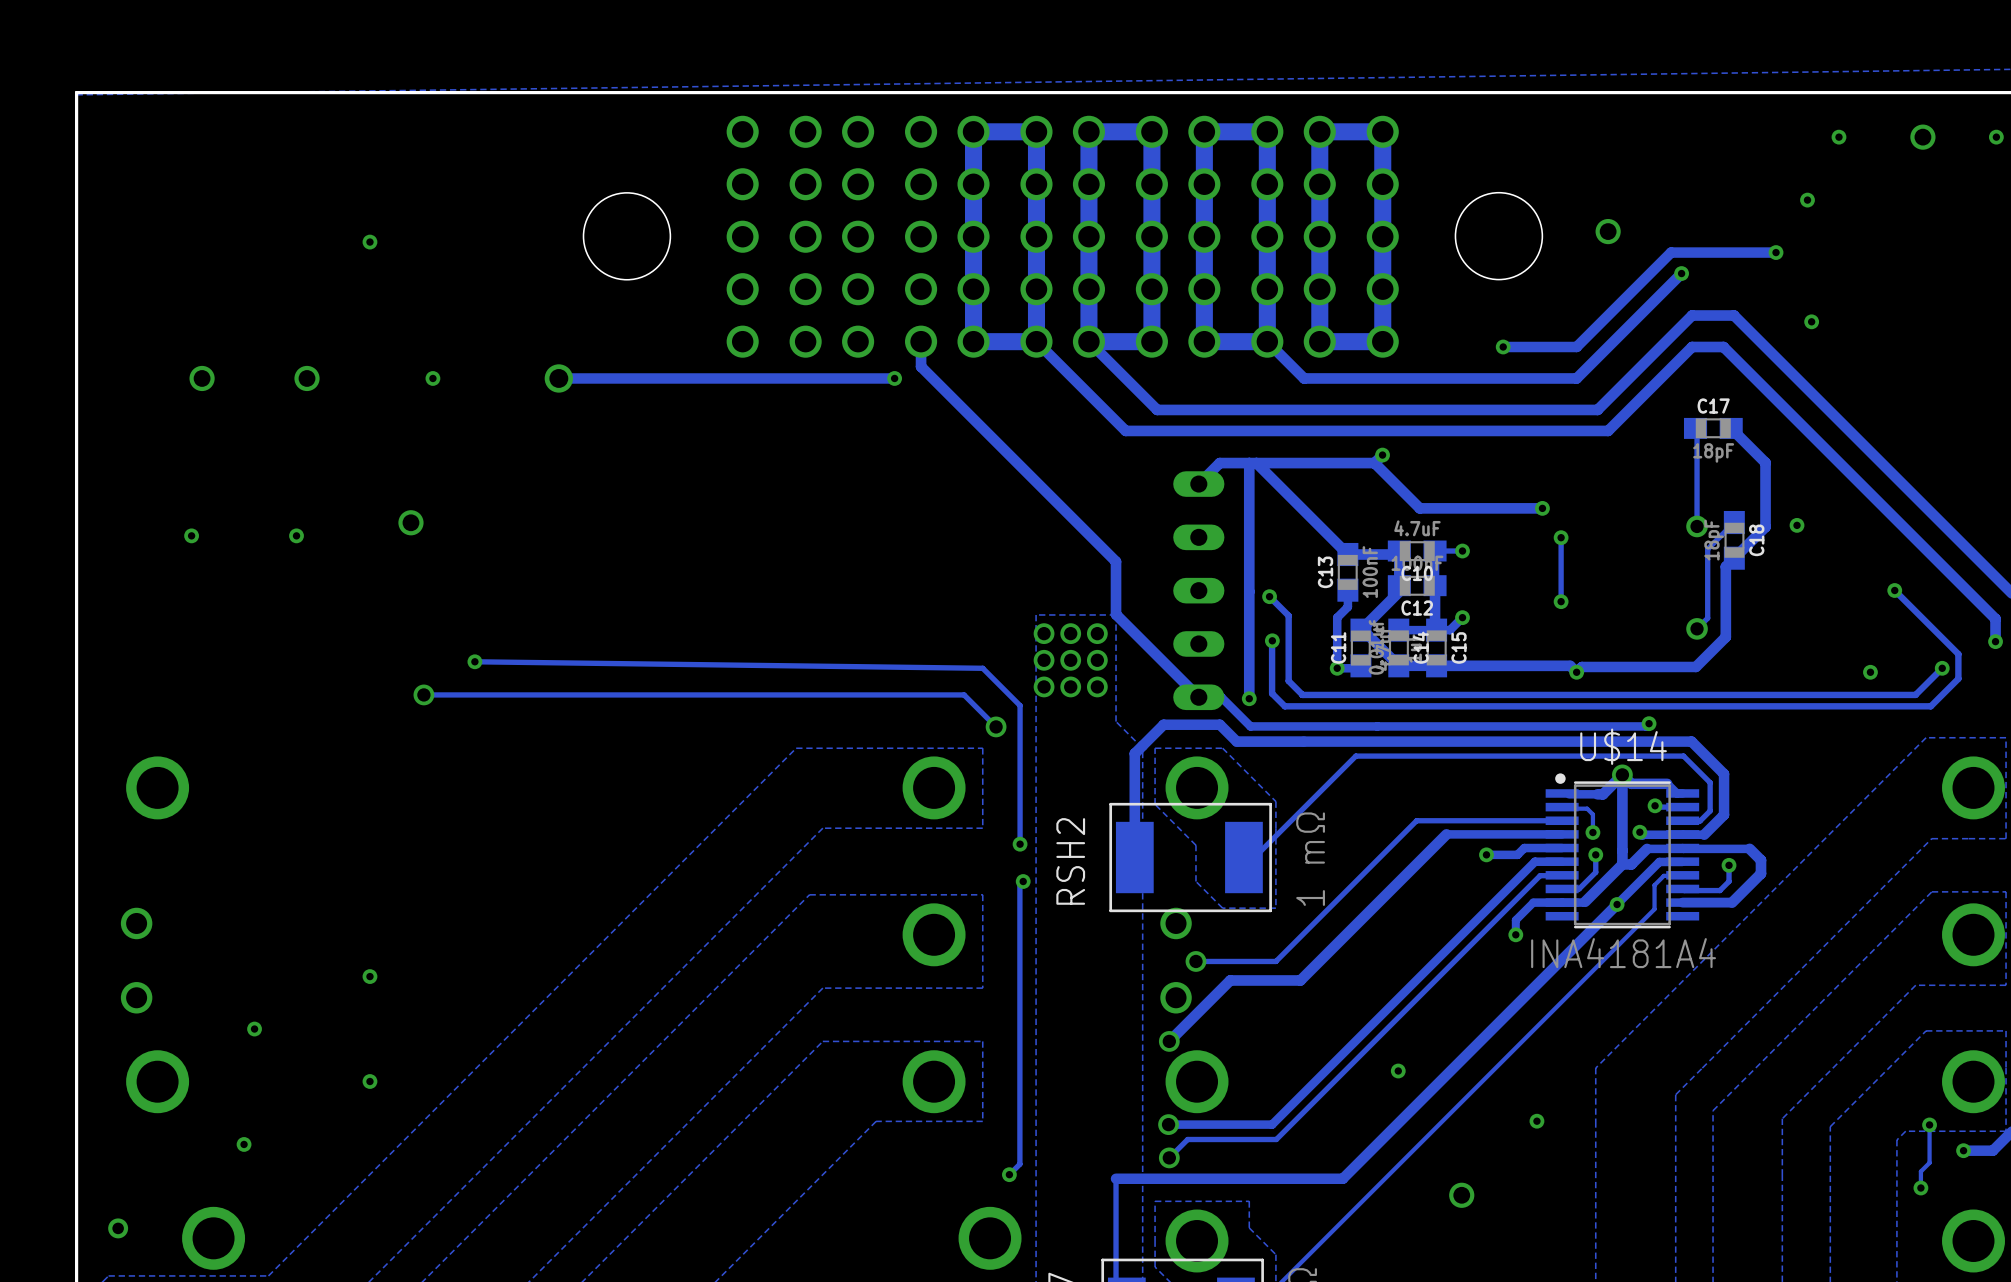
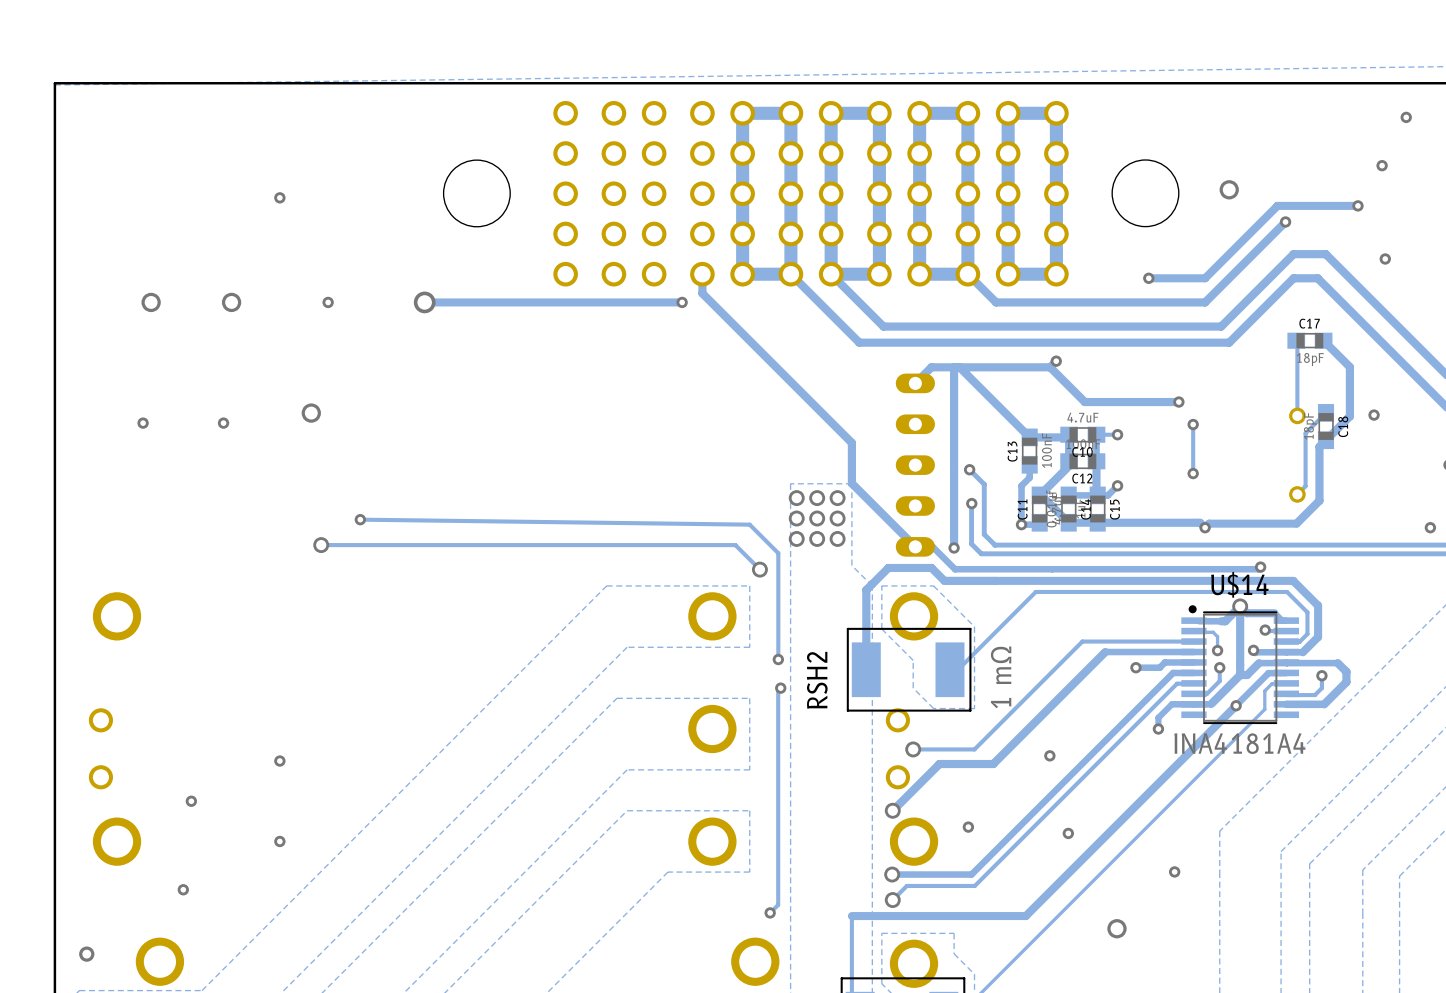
via: none -> (1049, 755)
via: none -> (968, 827)

